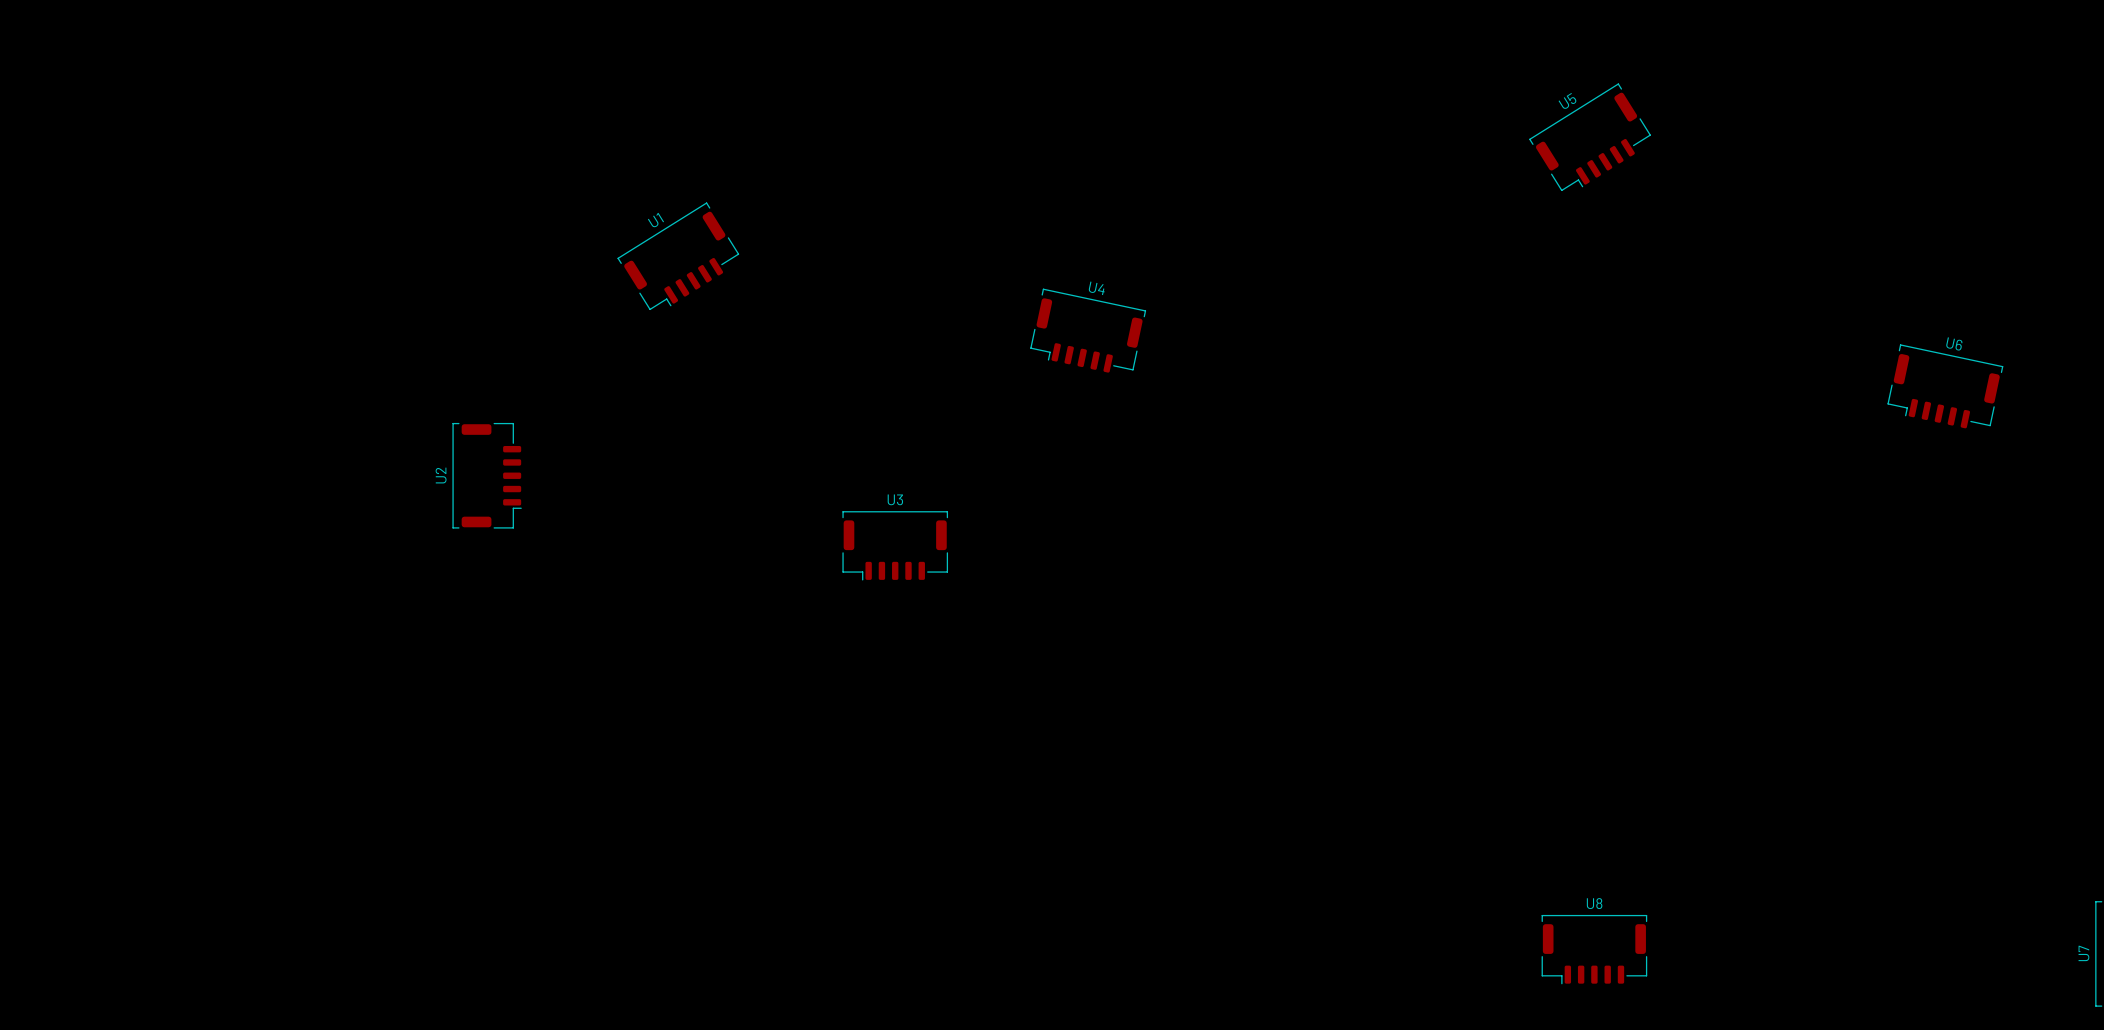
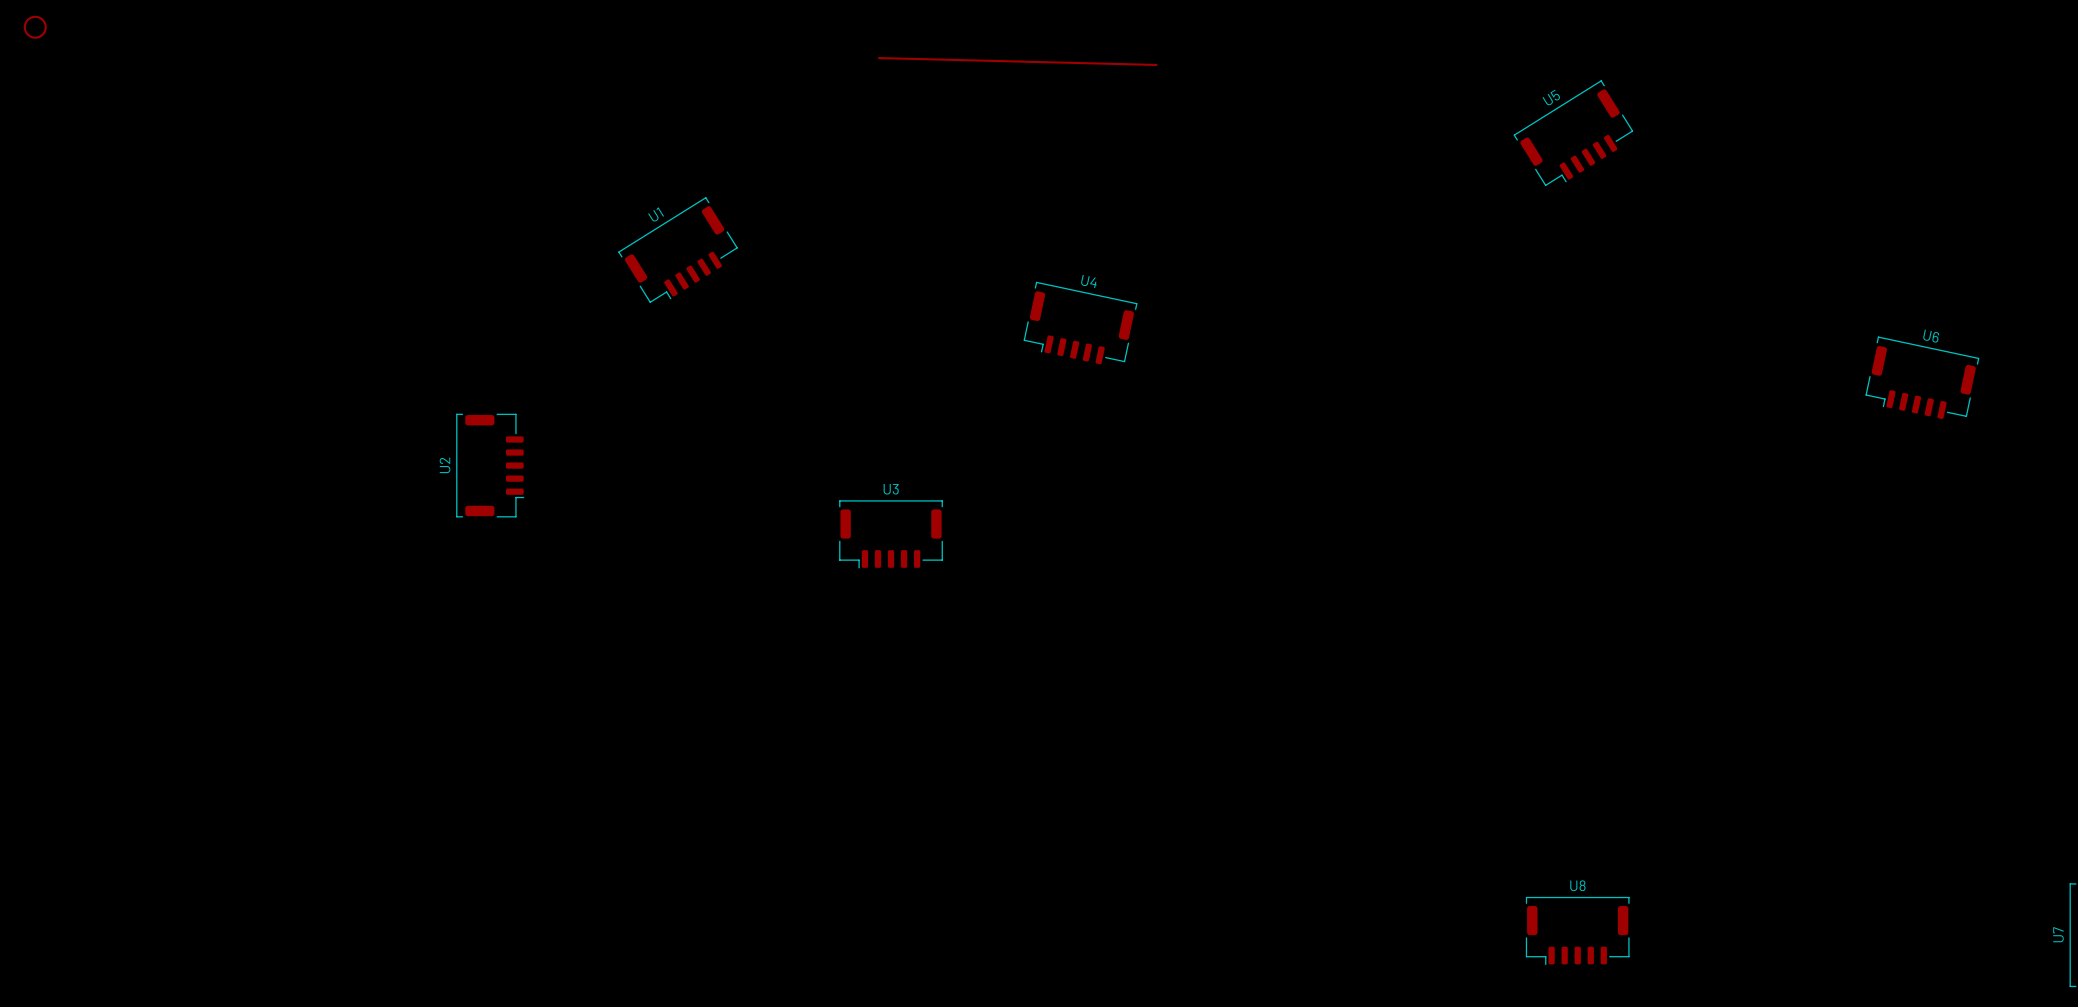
drawing: none -> [23, 15, 47, 39]
top track: none -> (878, 58) (1156, 64)

